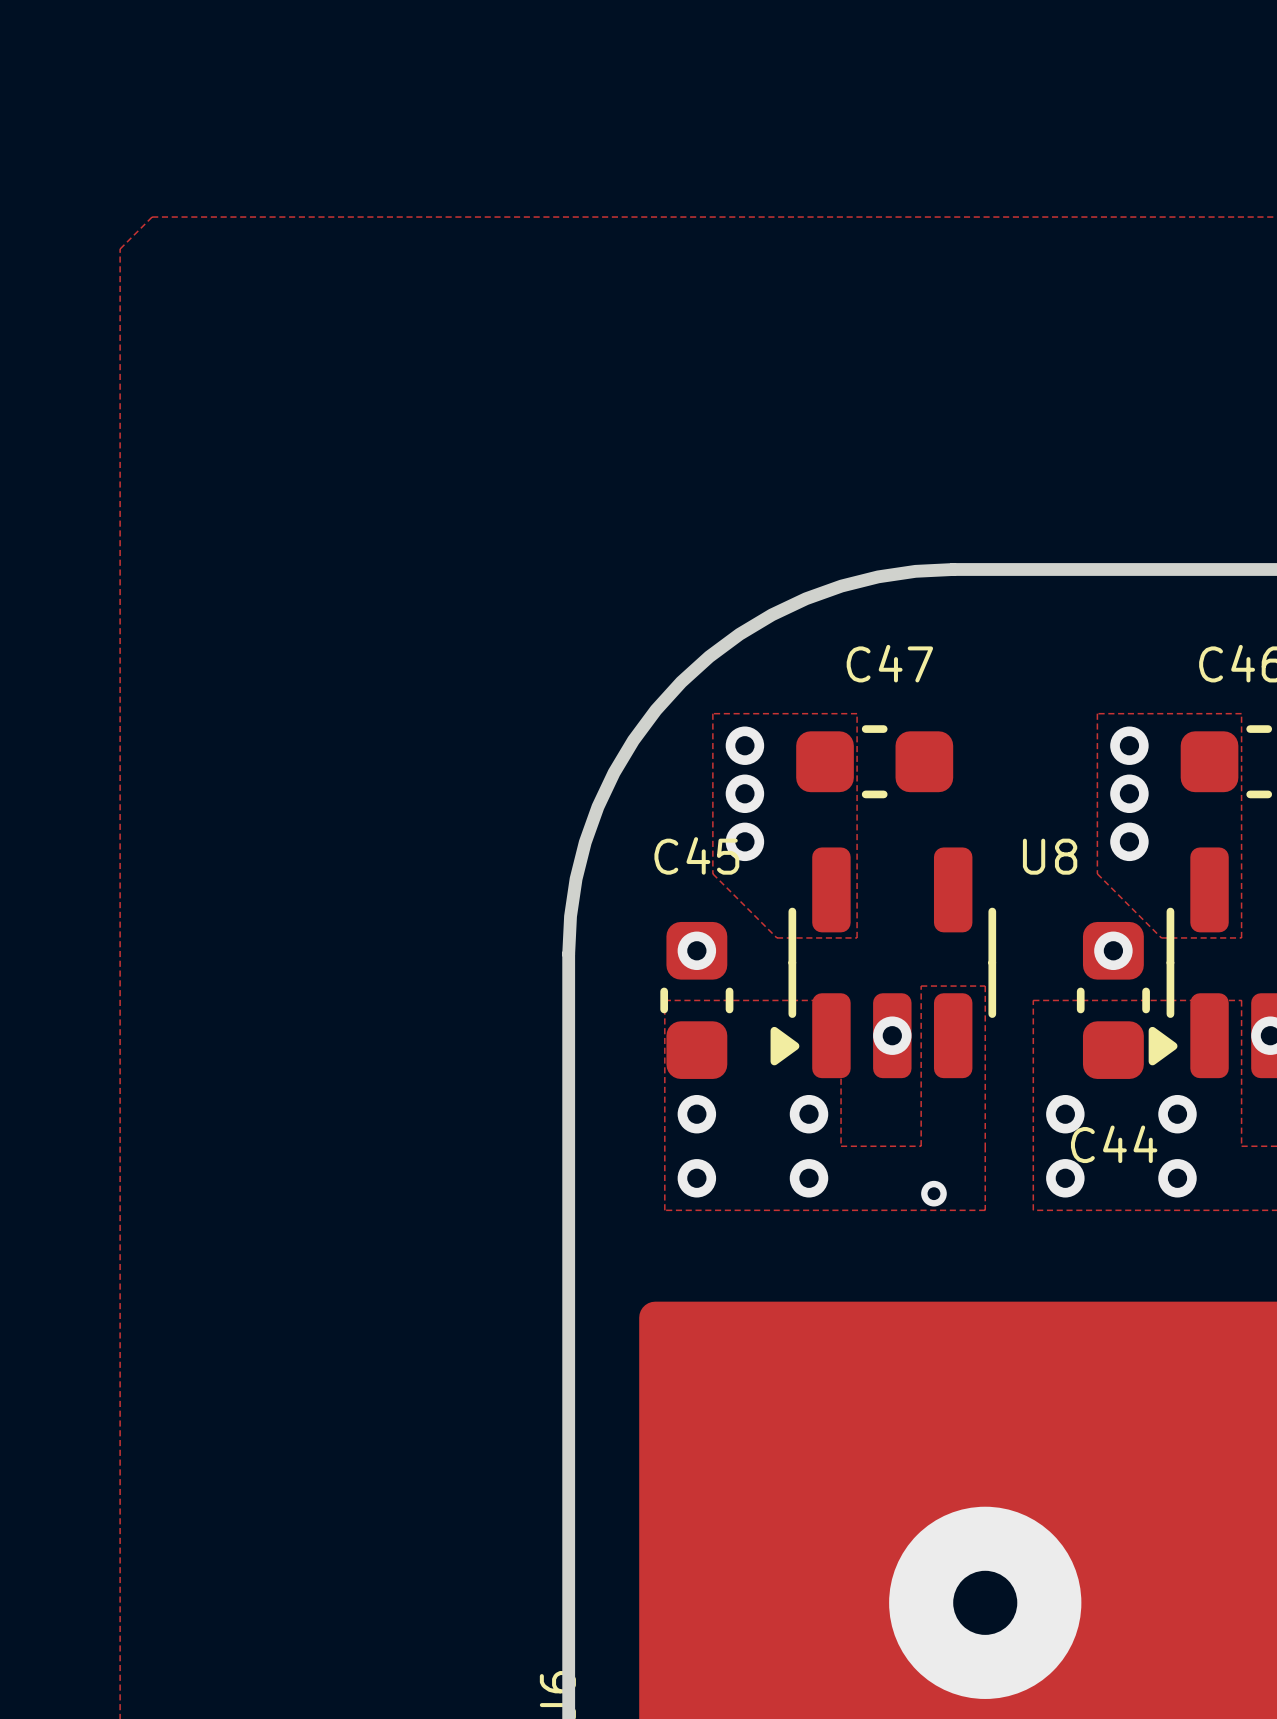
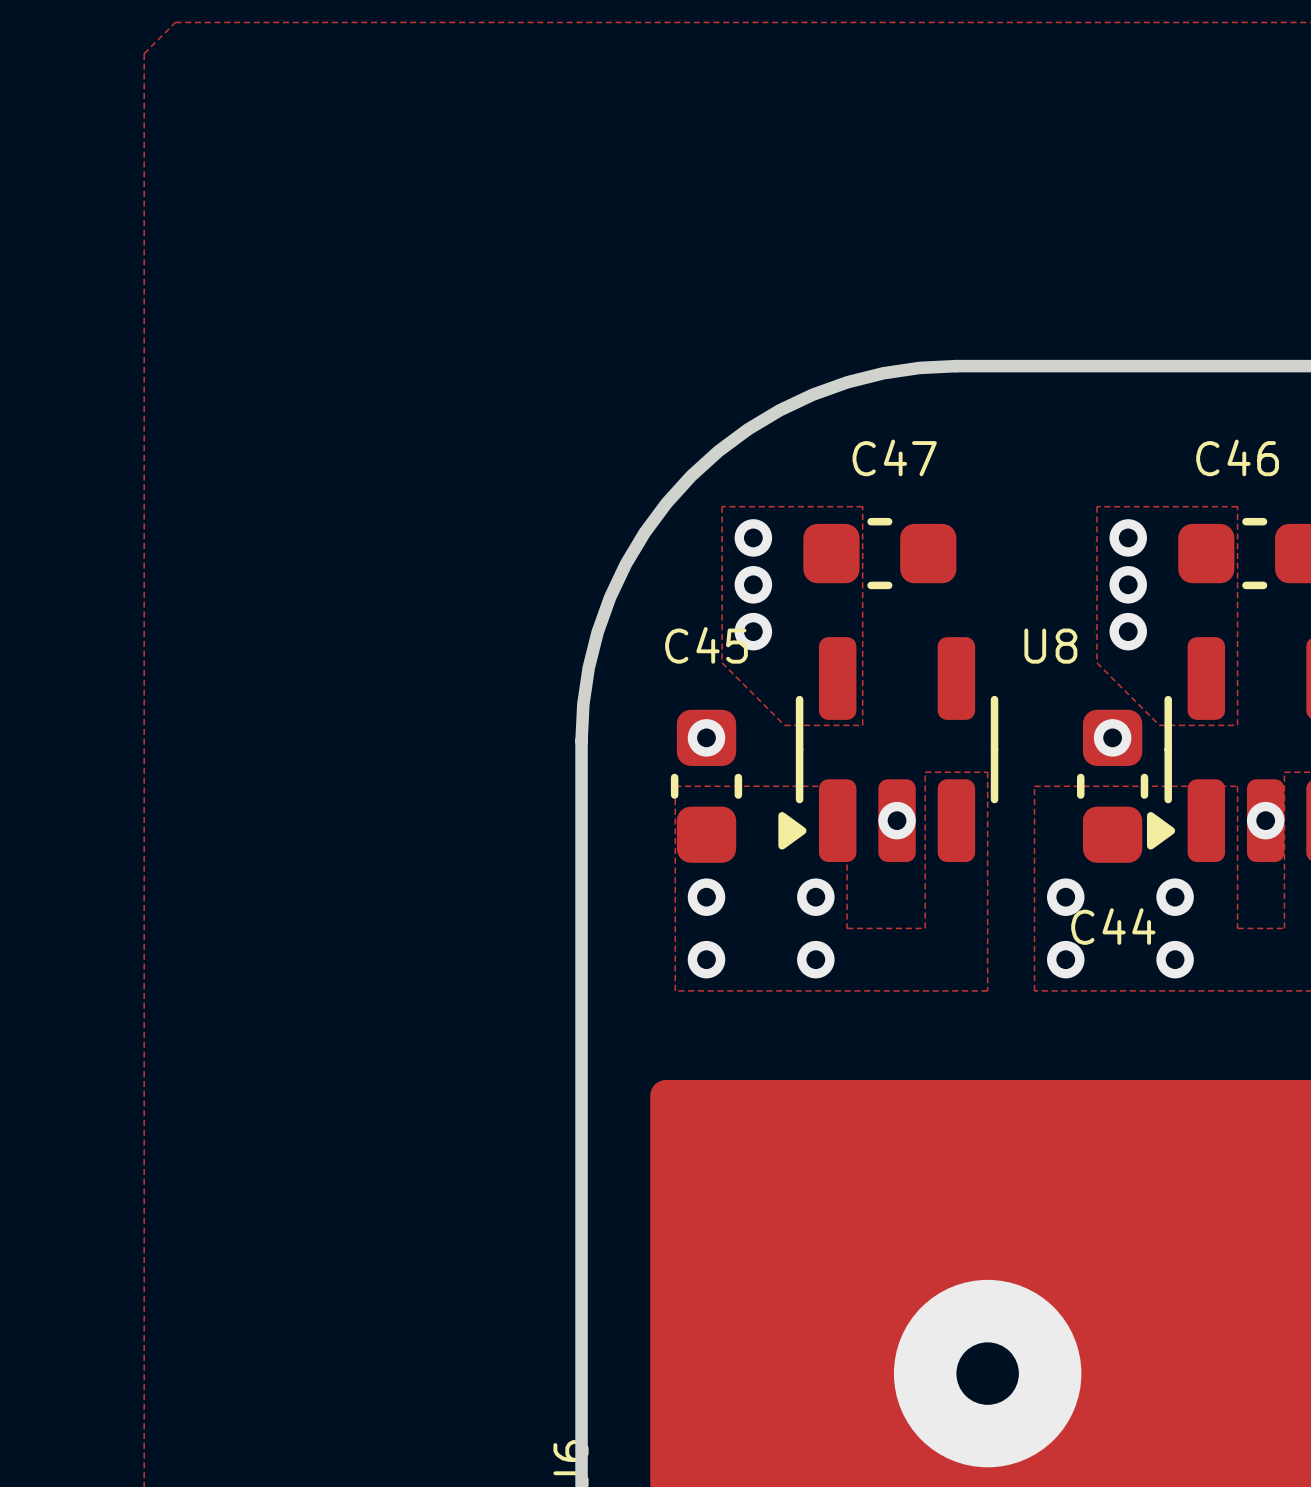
via: (933, 1193) -> none

